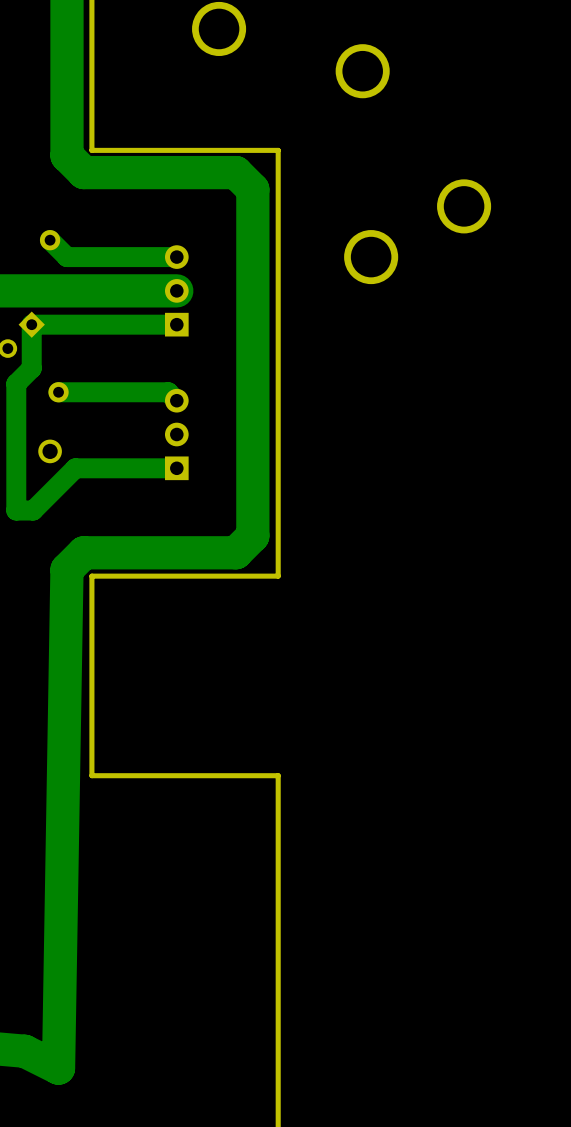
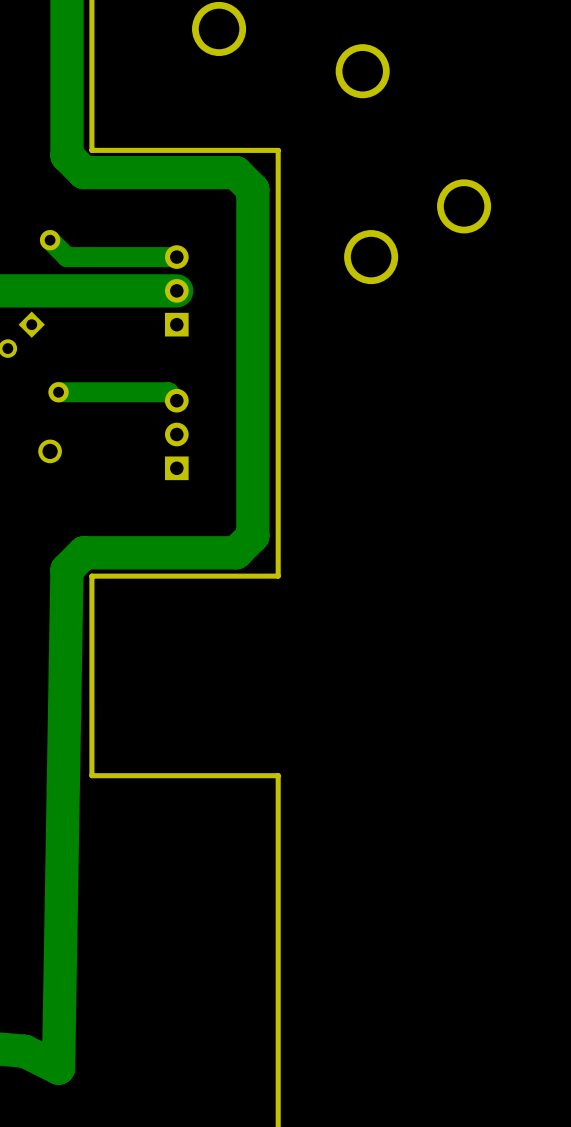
track: (176, 324) (31, 324) (31, 368) (16, 383) (16, 510) (33, 510) (75, 468) (176, 468) -> none

